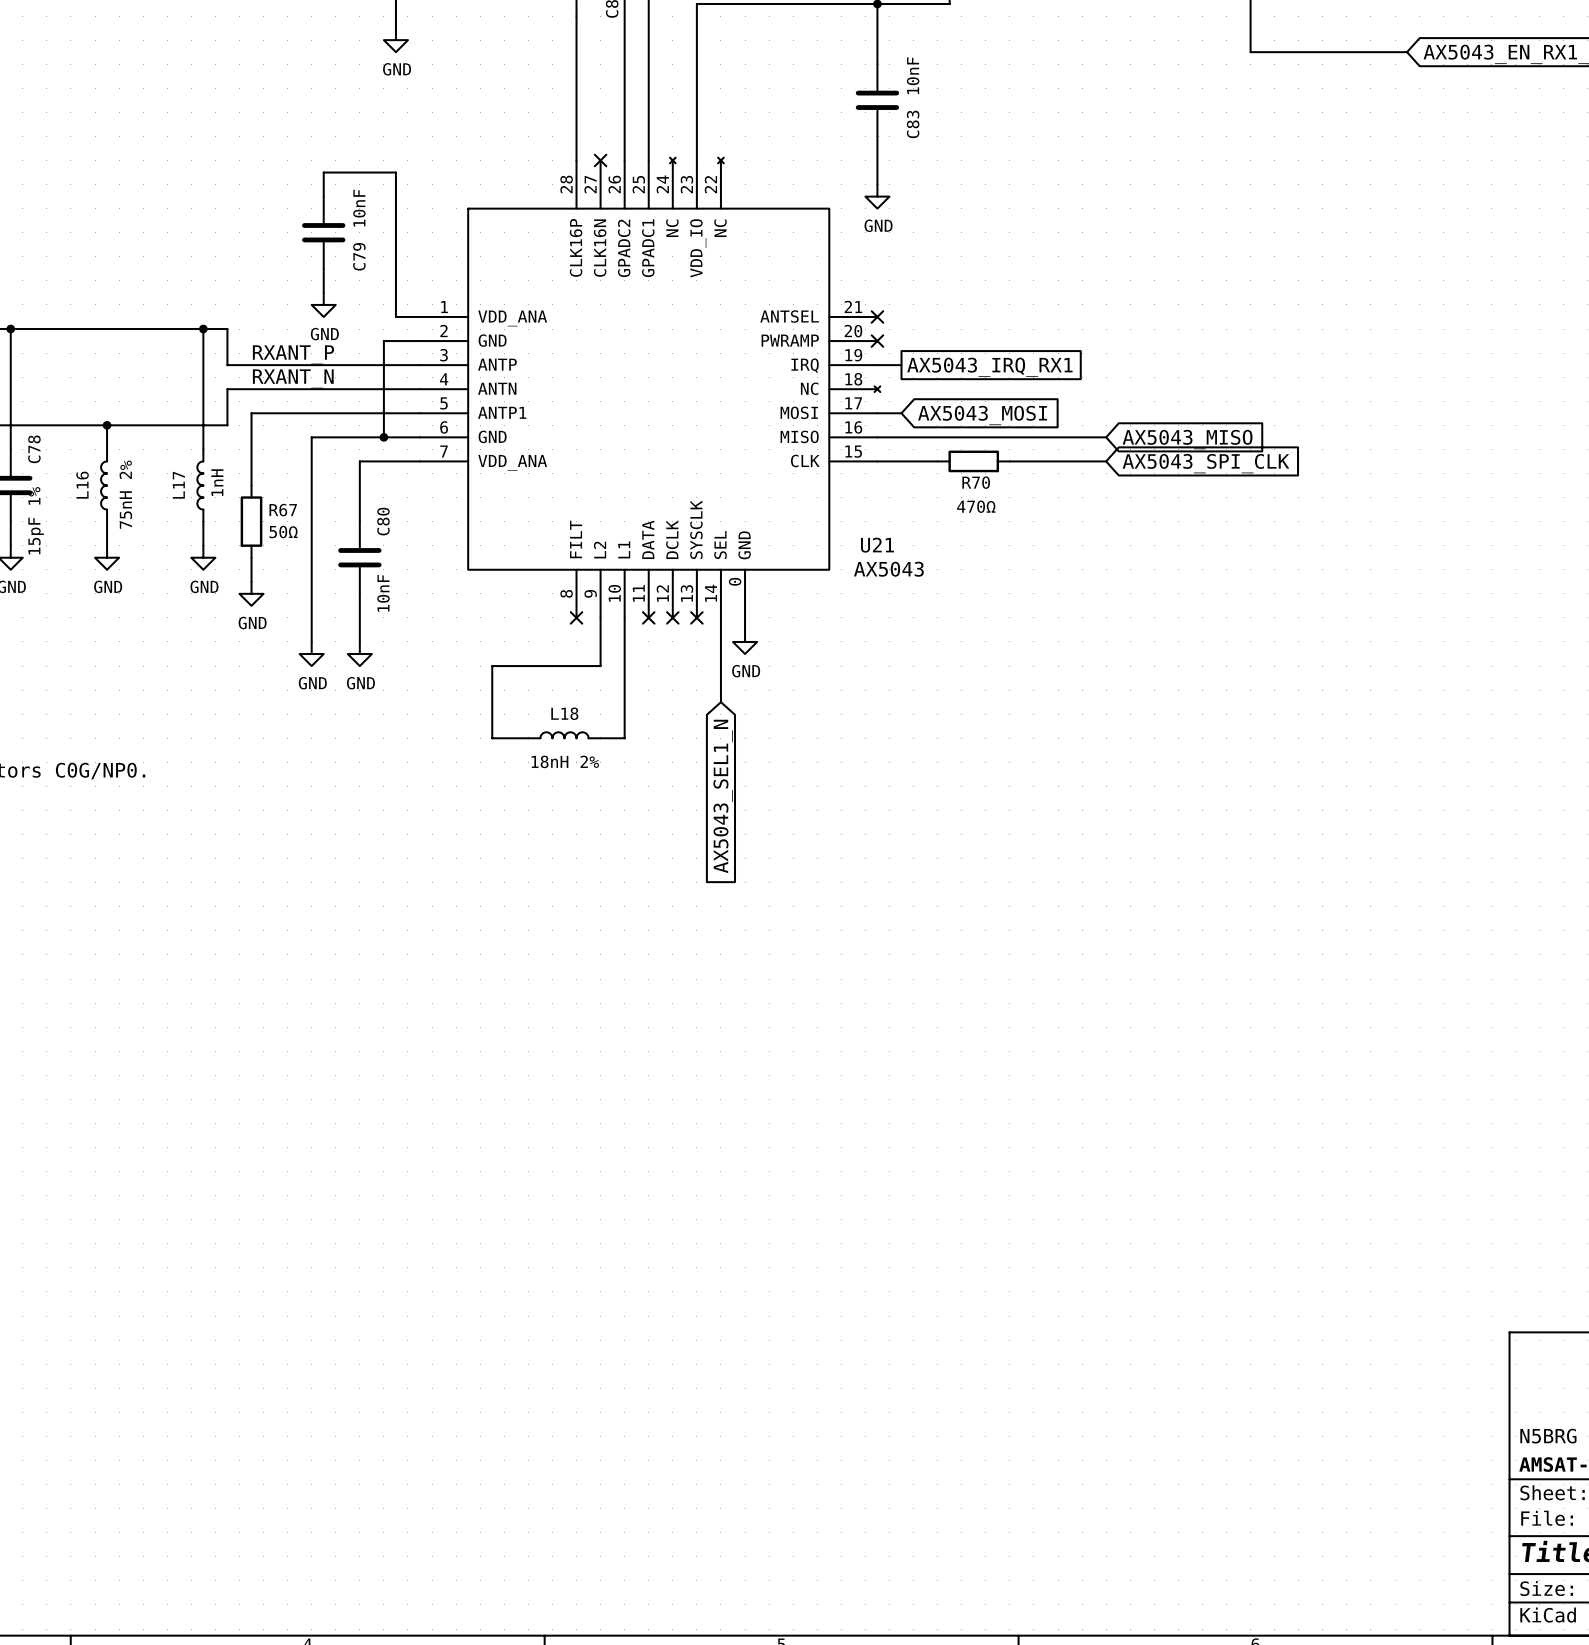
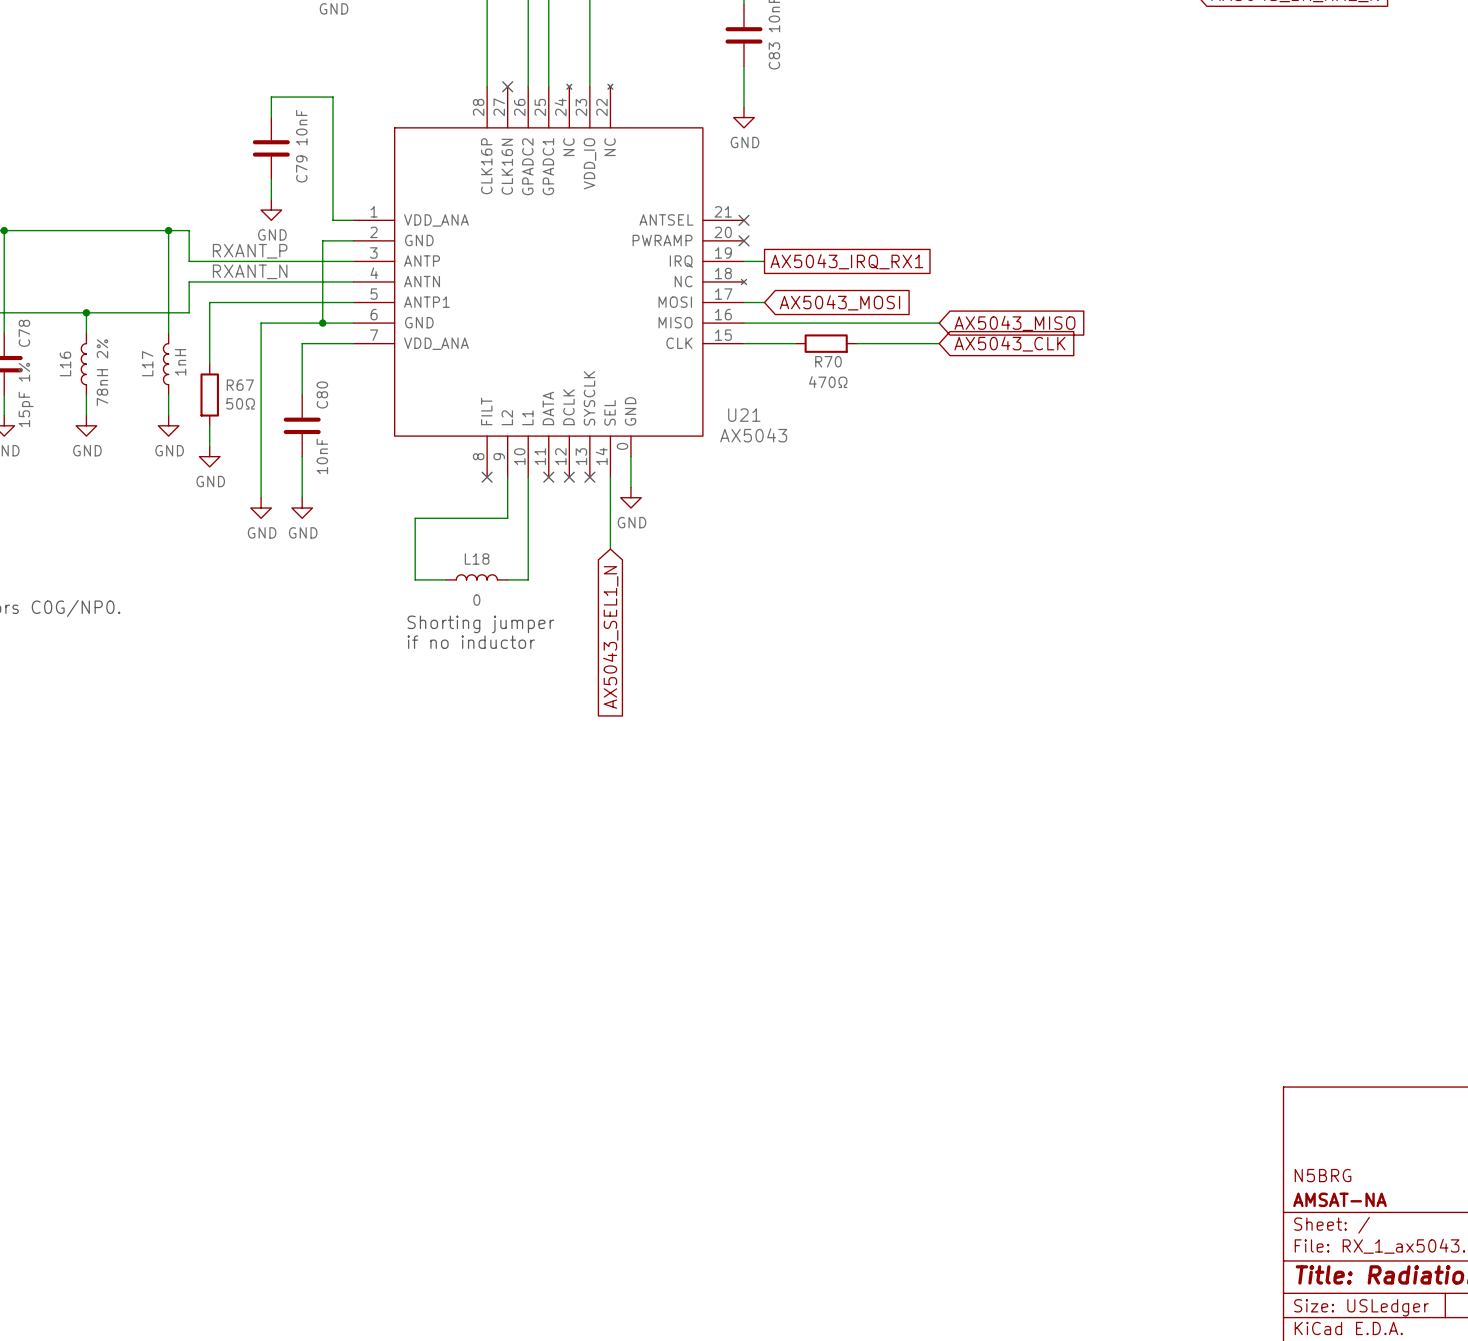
global label: AX5043_SPI_CLK (1206, 463) -> AX5043_CLK (1009, 343)
L16 value: 75nH 2% (125, 494) -> 78nH 2% (102, 372)
L18 value: 18nH 2% (565, 761) -> 0 (476, 600)
text: none -> Shorting jumper (480, 624)
text: none -> if no inductor (471, 642)

